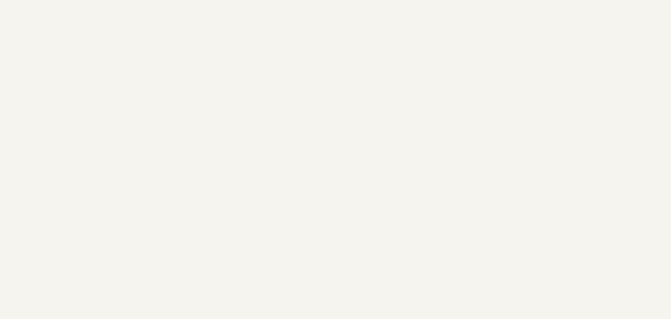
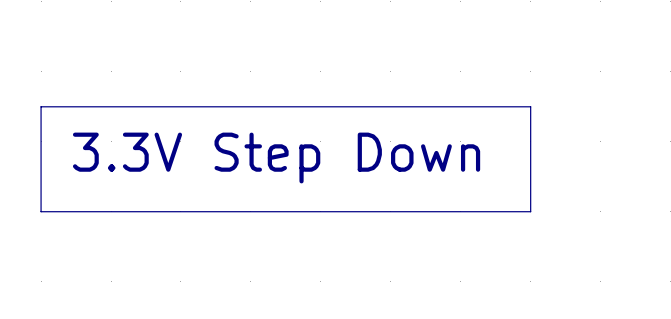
line: none -> (41, 106) (530, 106) (530, 211) (41, 211) (41, 106)
text: none -> 3.3V Step Down (276, 158)

